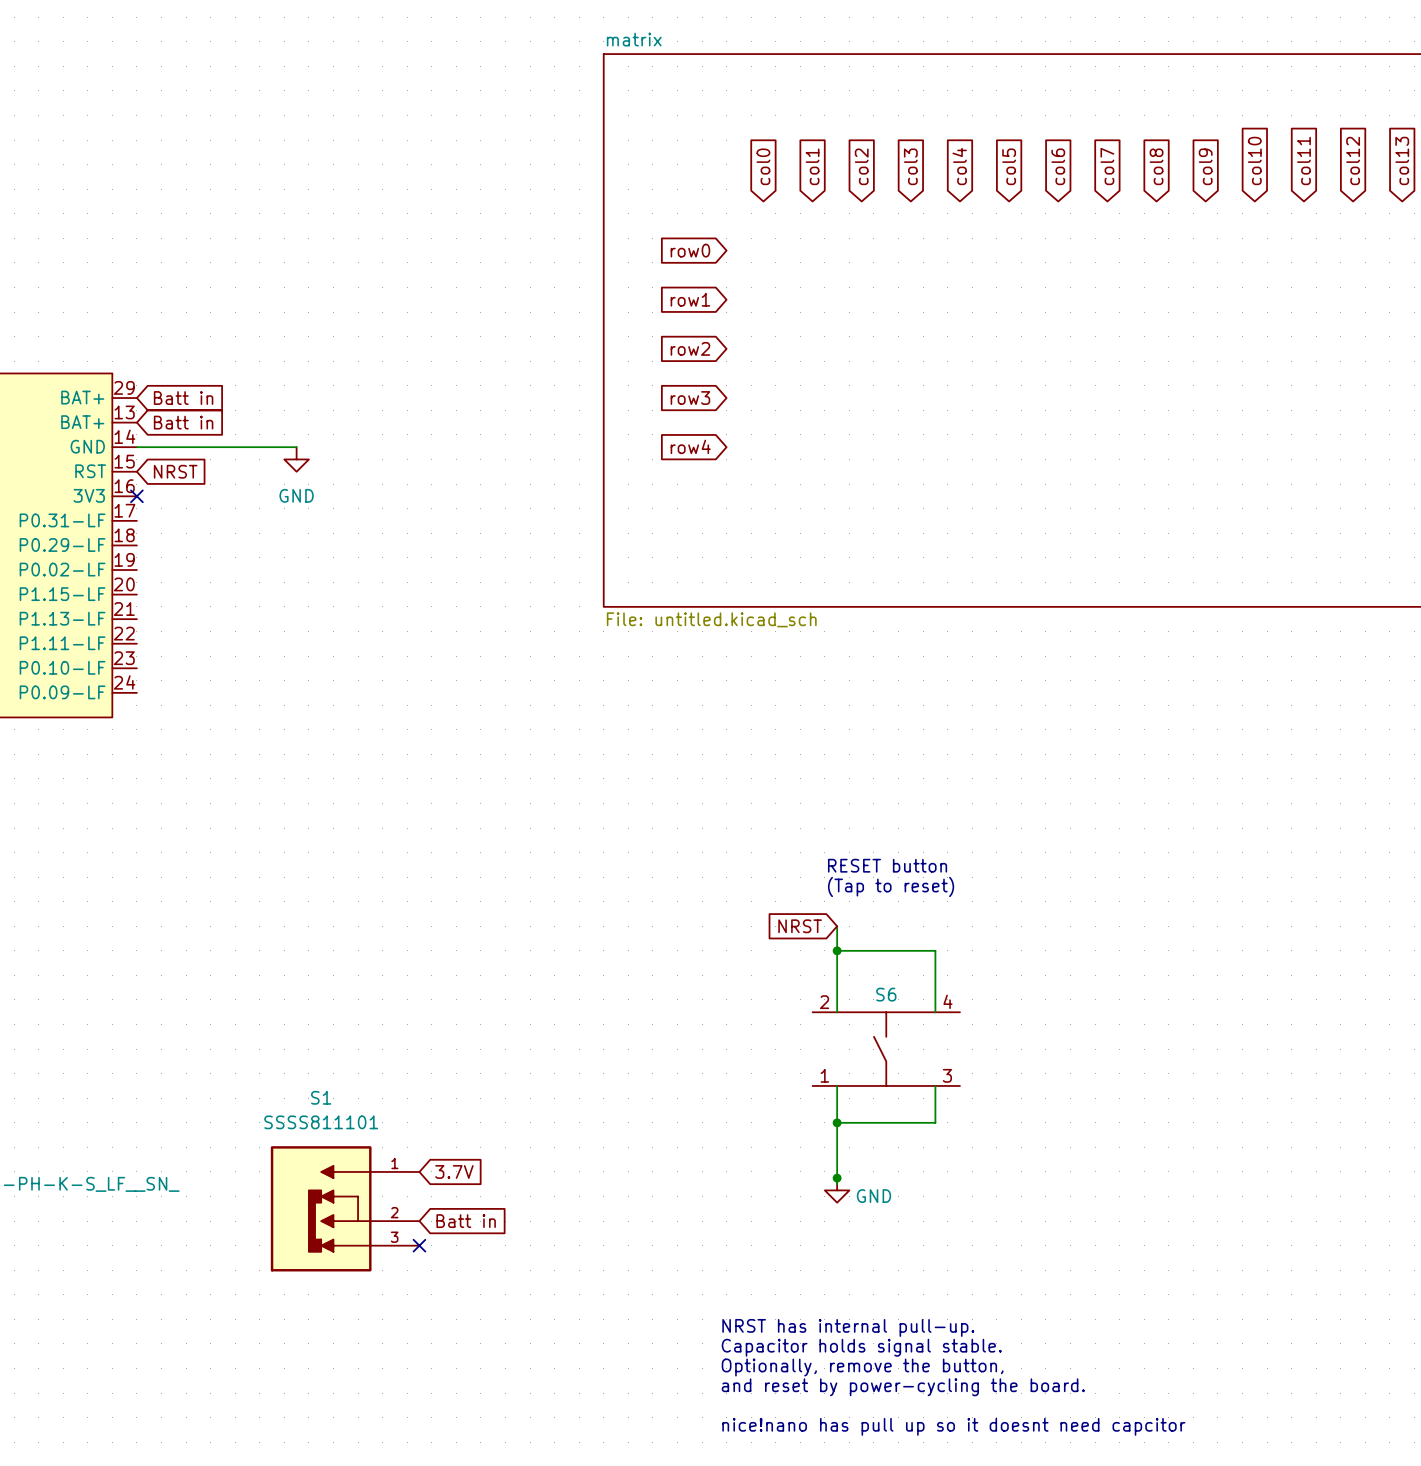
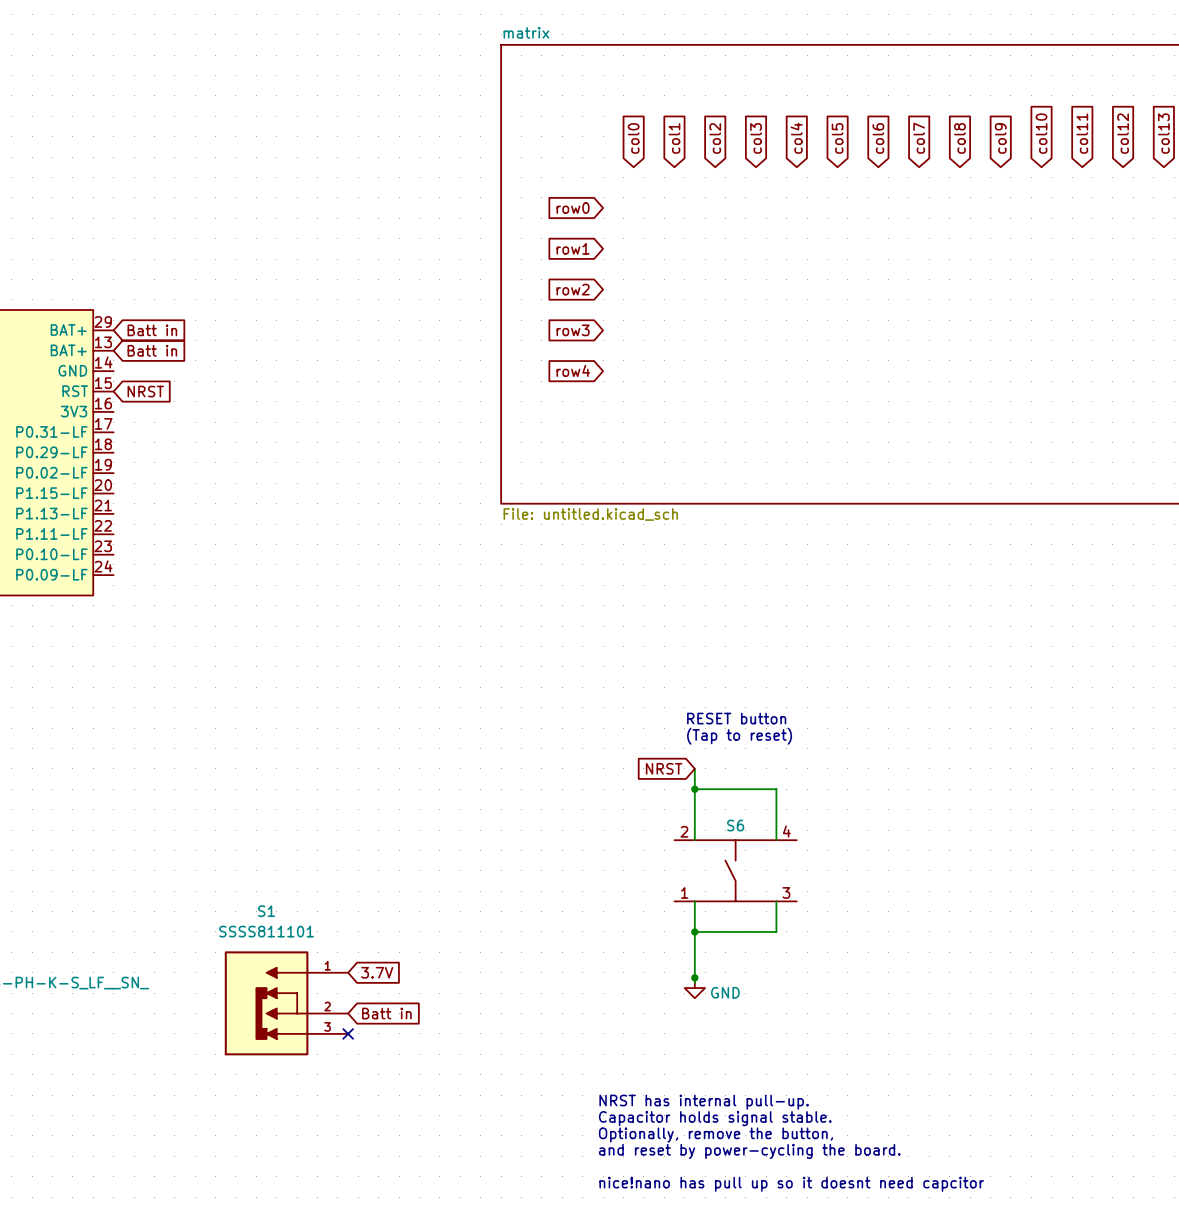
wire: (136, 447) (296, 447) -> none
power symbol: GND (296, 459) -> none
no-connect mark: (136, 496) -> none

